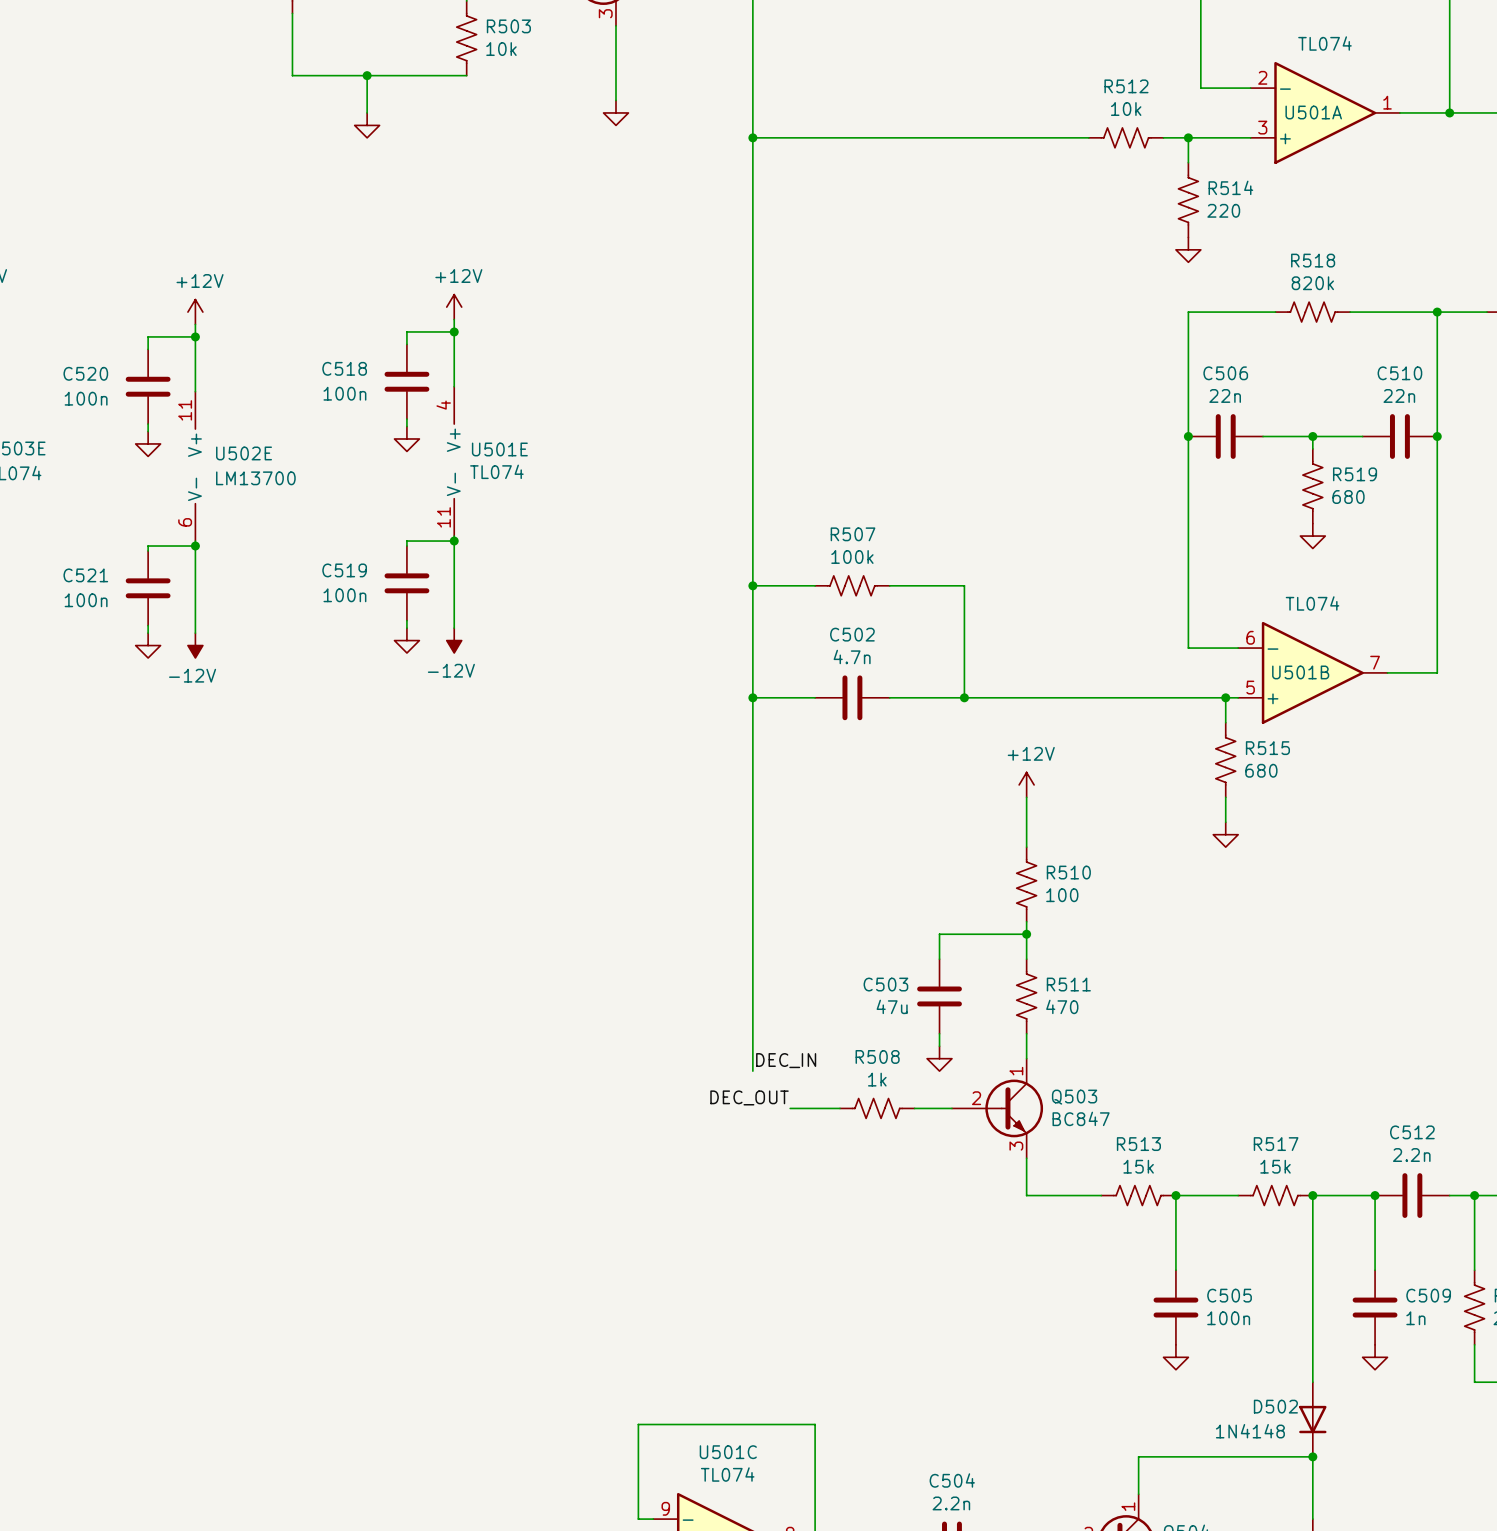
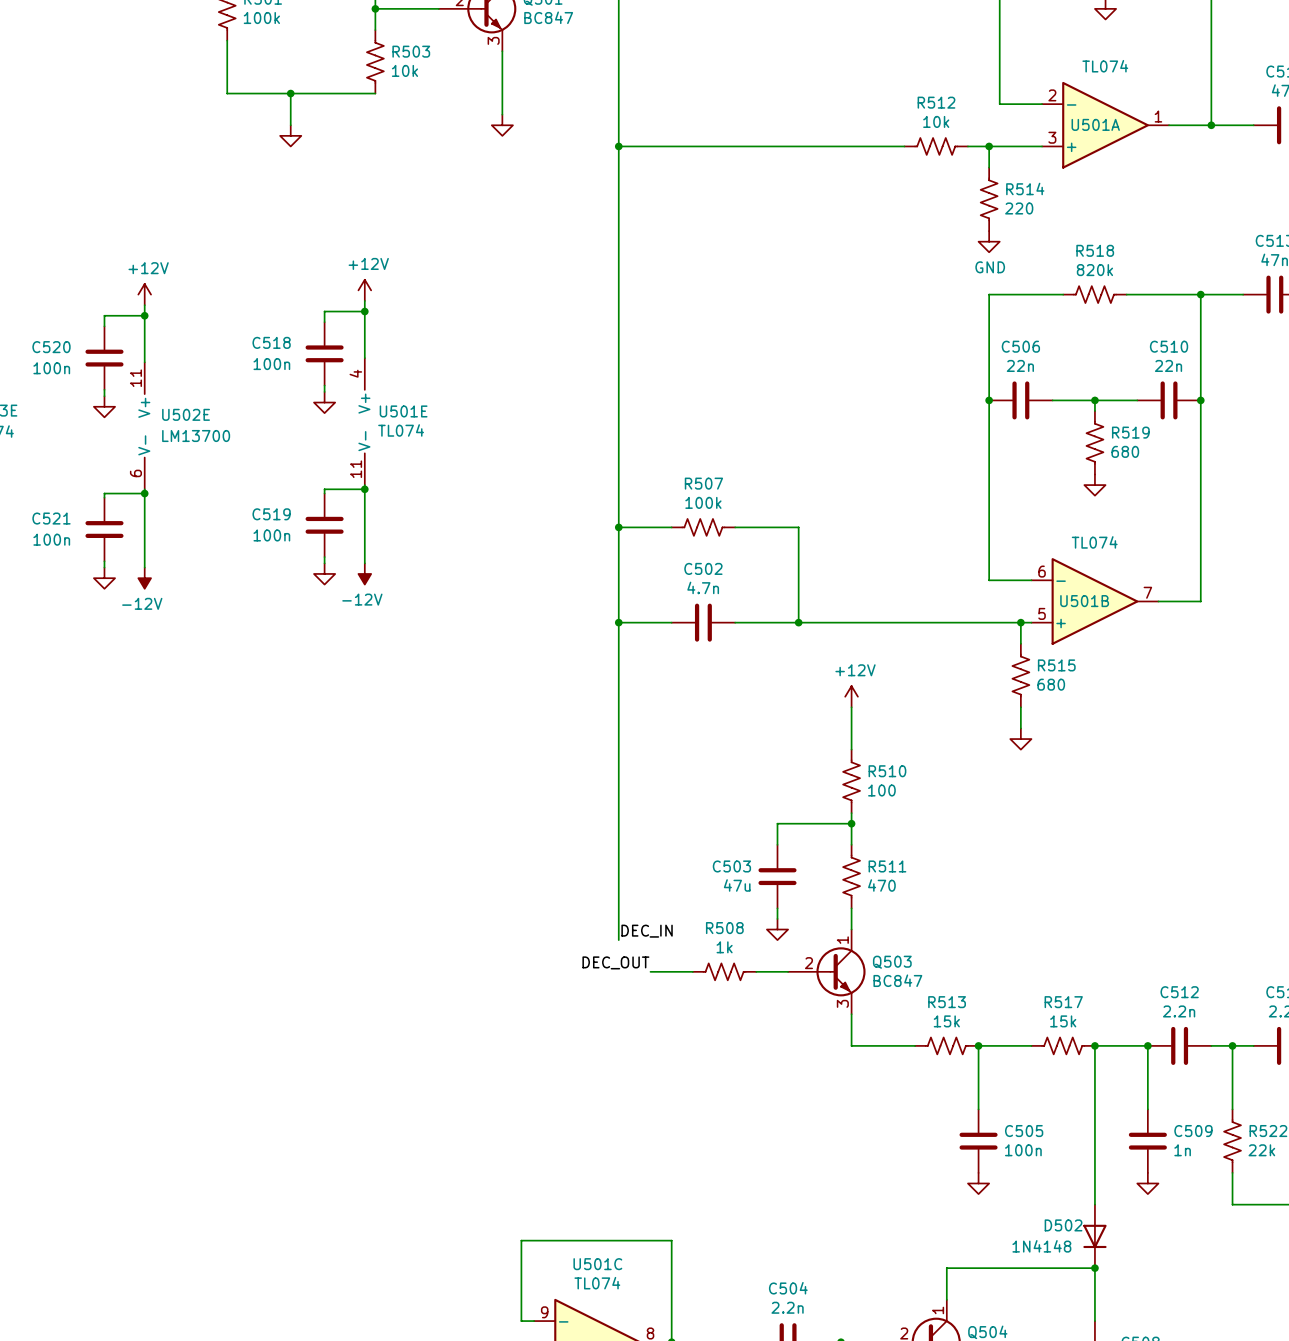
power symbol text: none -> GND (990, 267)

